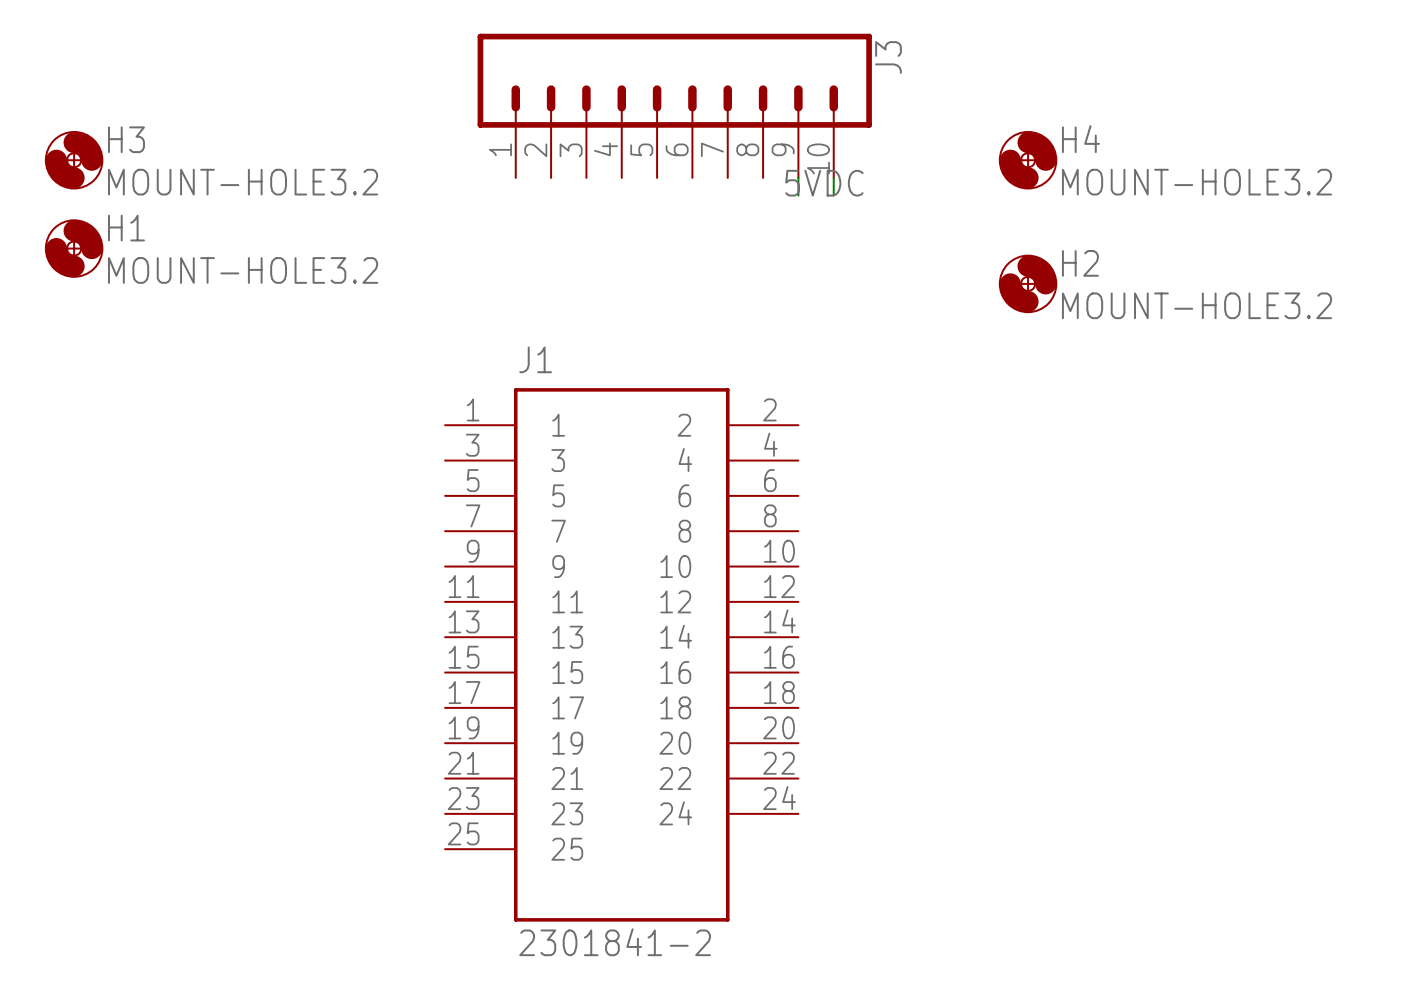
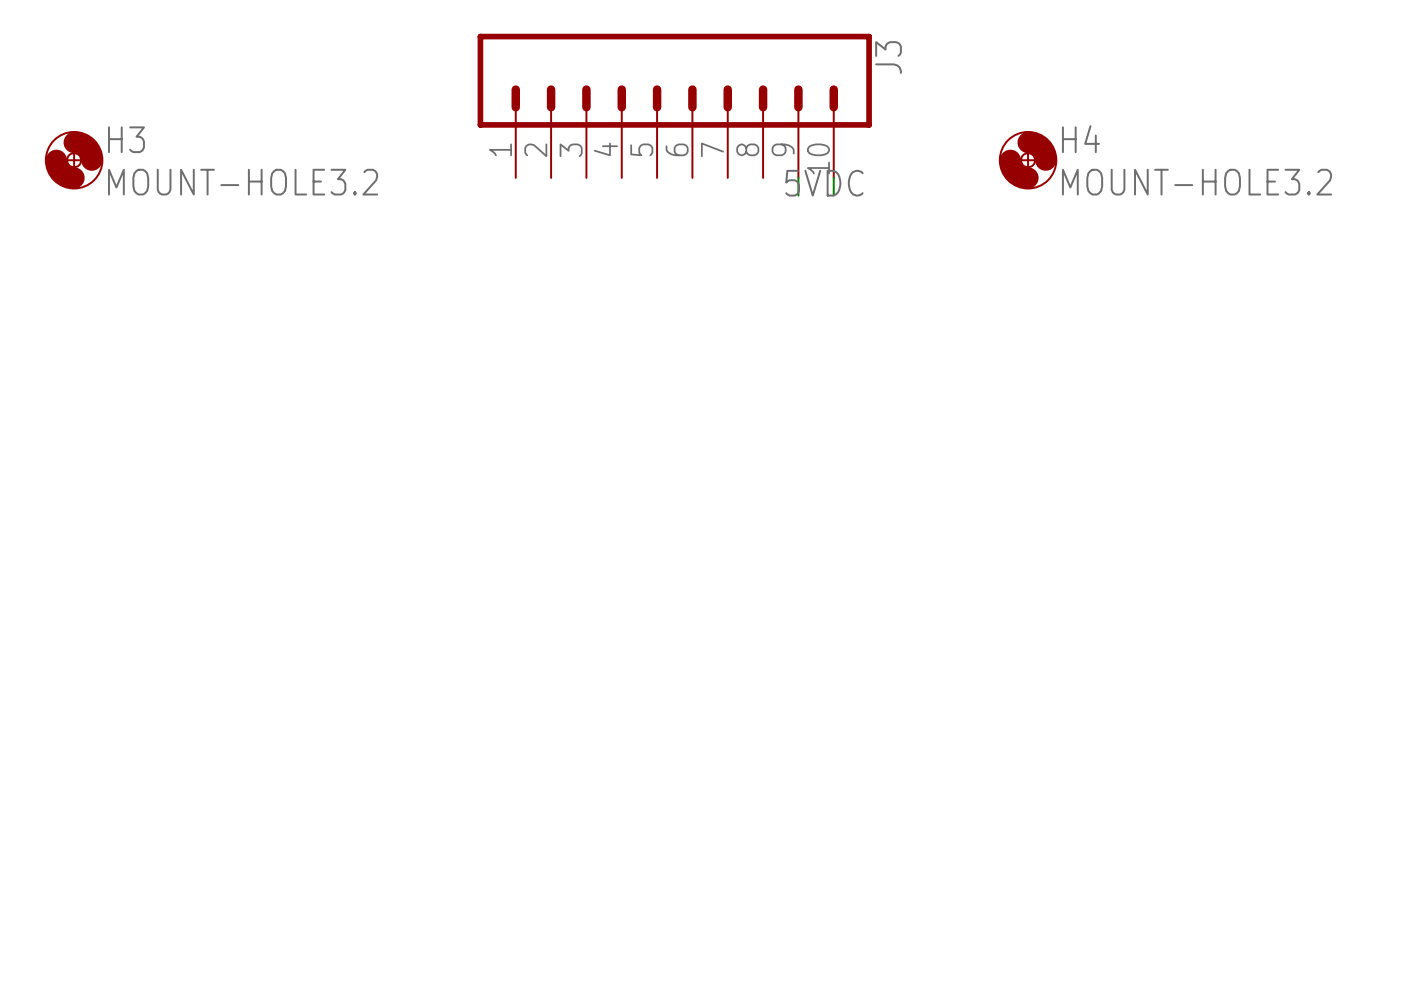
H1: MOUNT-HOLE3.2 (74, 248) -> none
H2: MOUNT-HOLE3.2 (1028, 283) -> none
J1: 2301841-2 (621, 654) -> none

